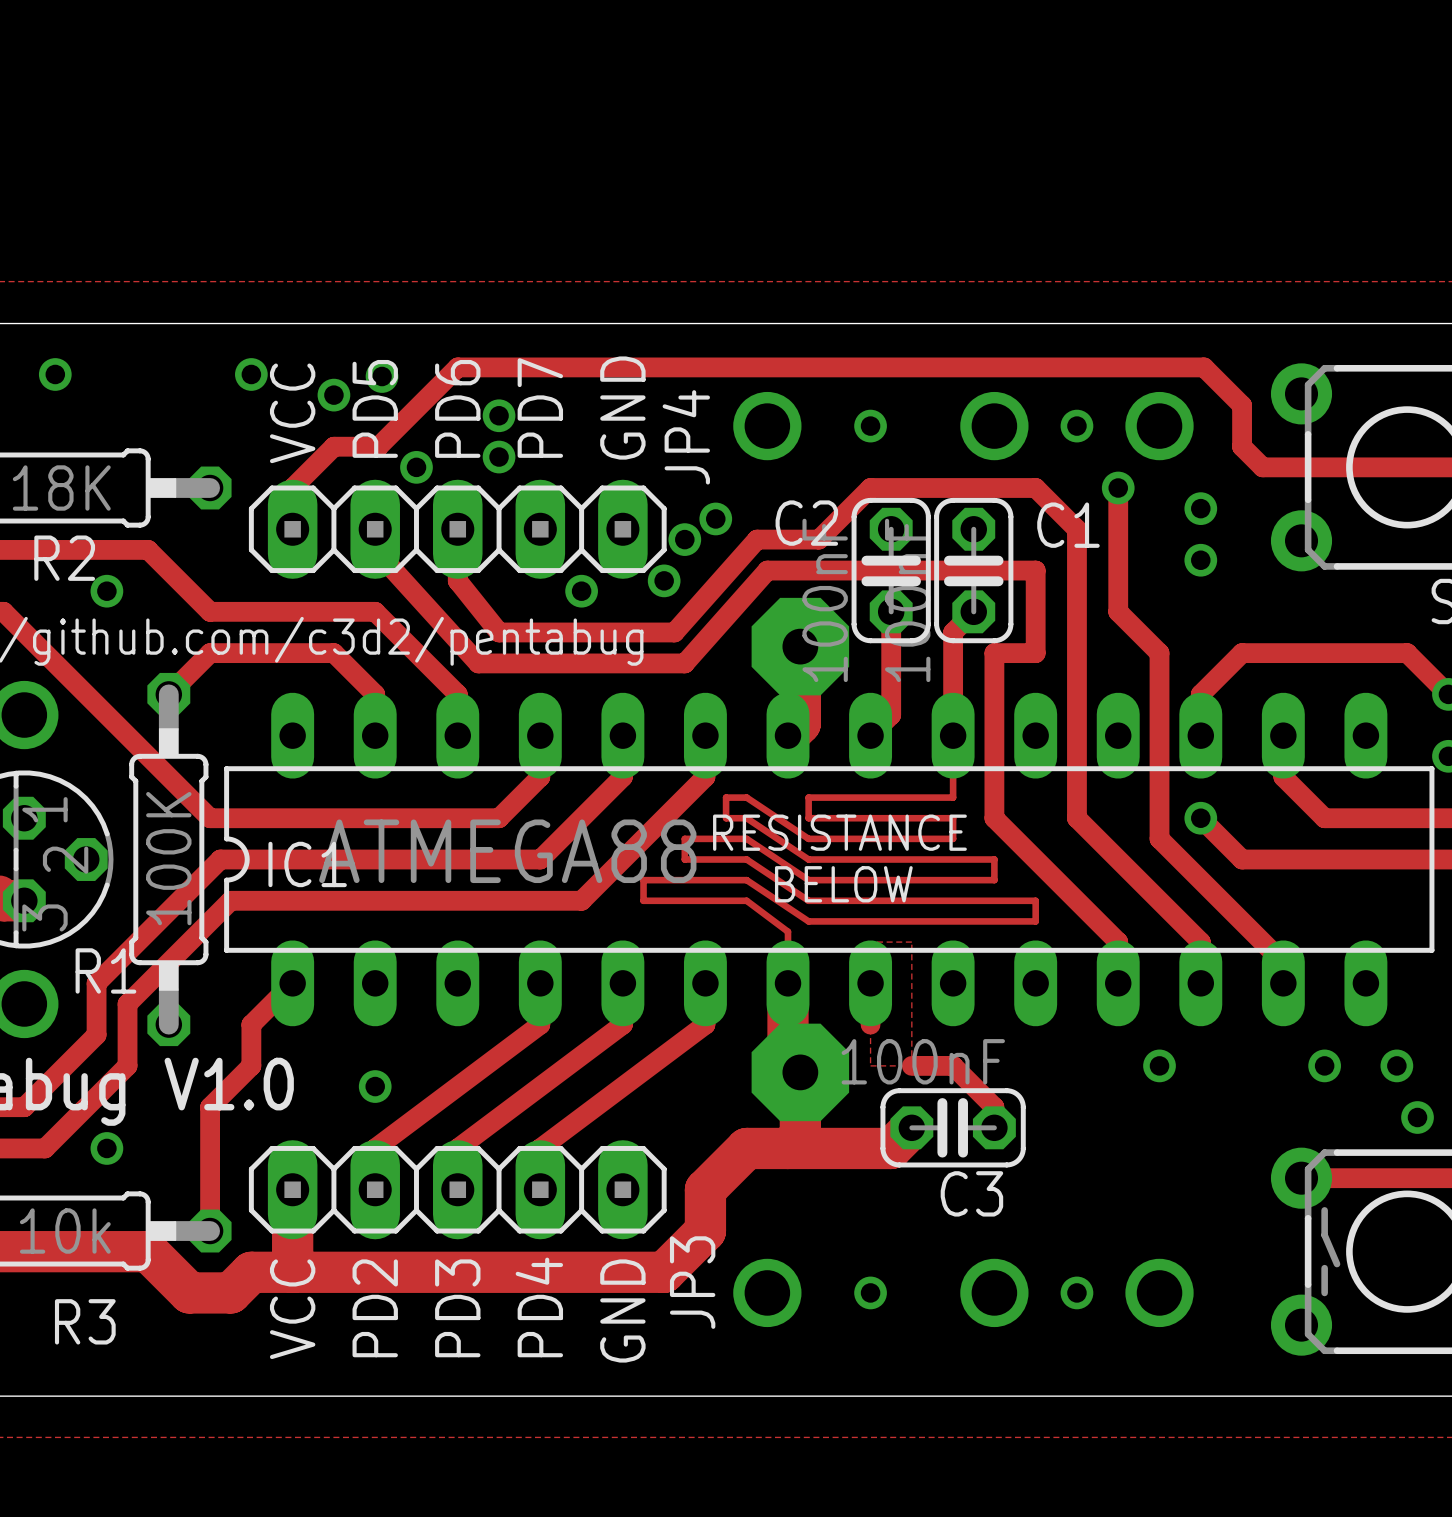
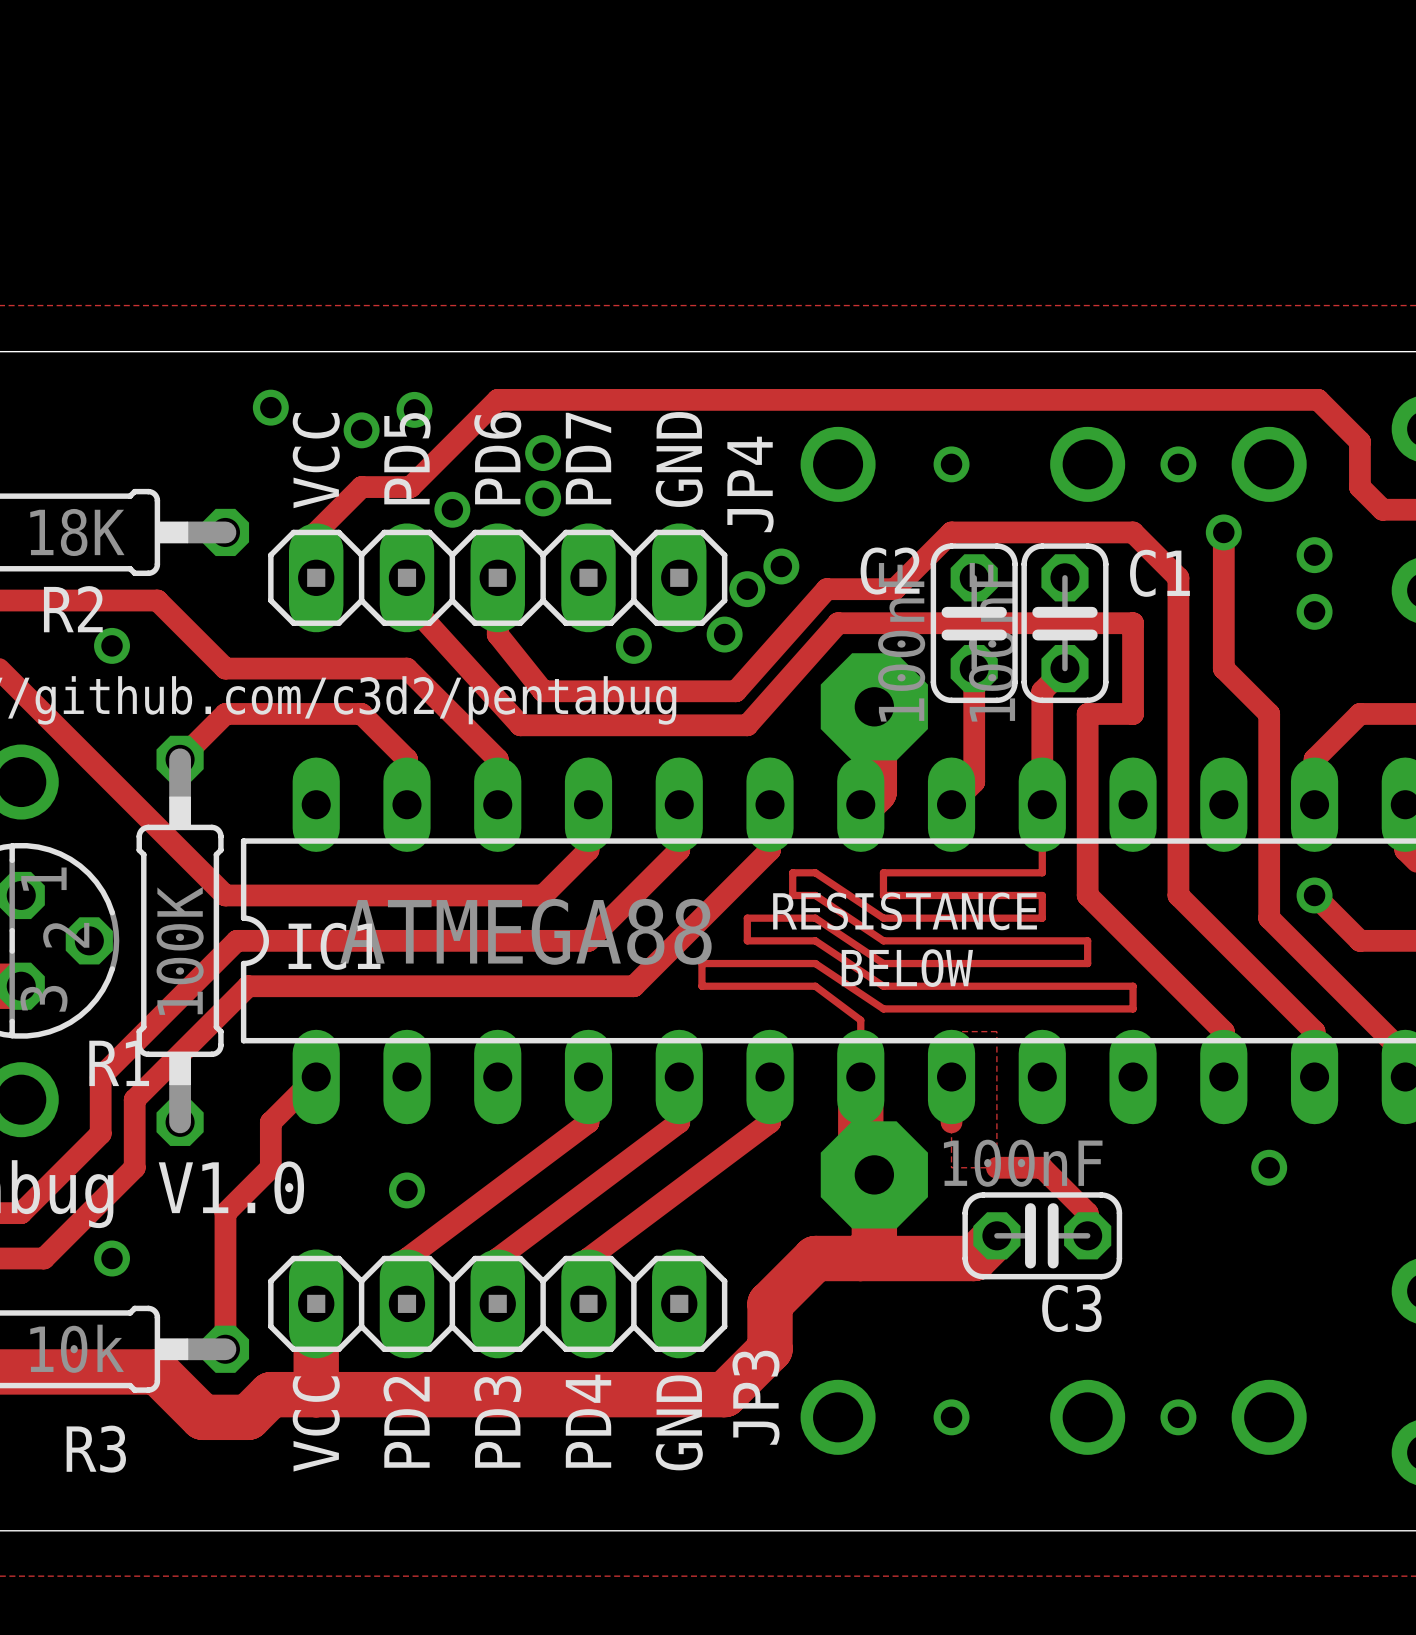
via: (55, 374) -> none

